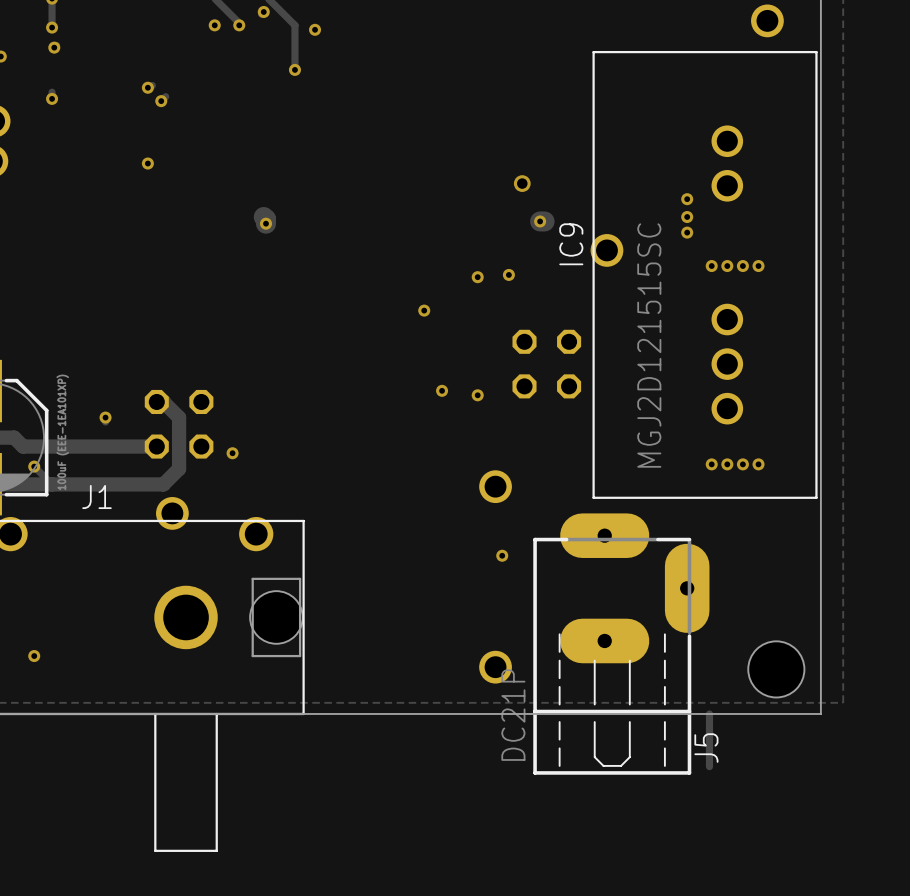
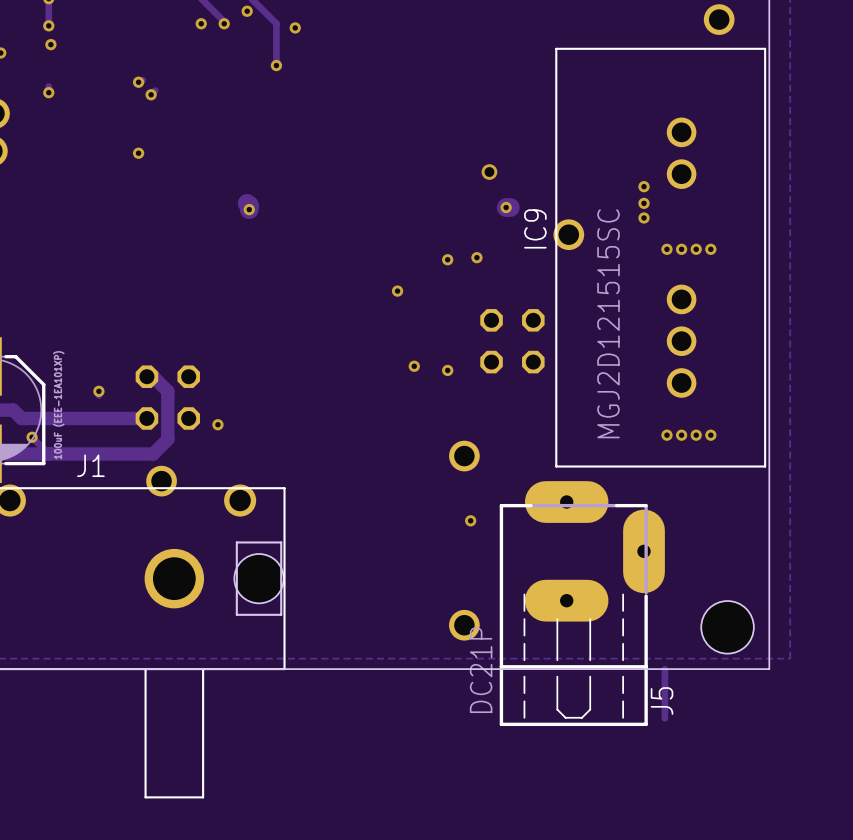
via: (34, 656) -> none

